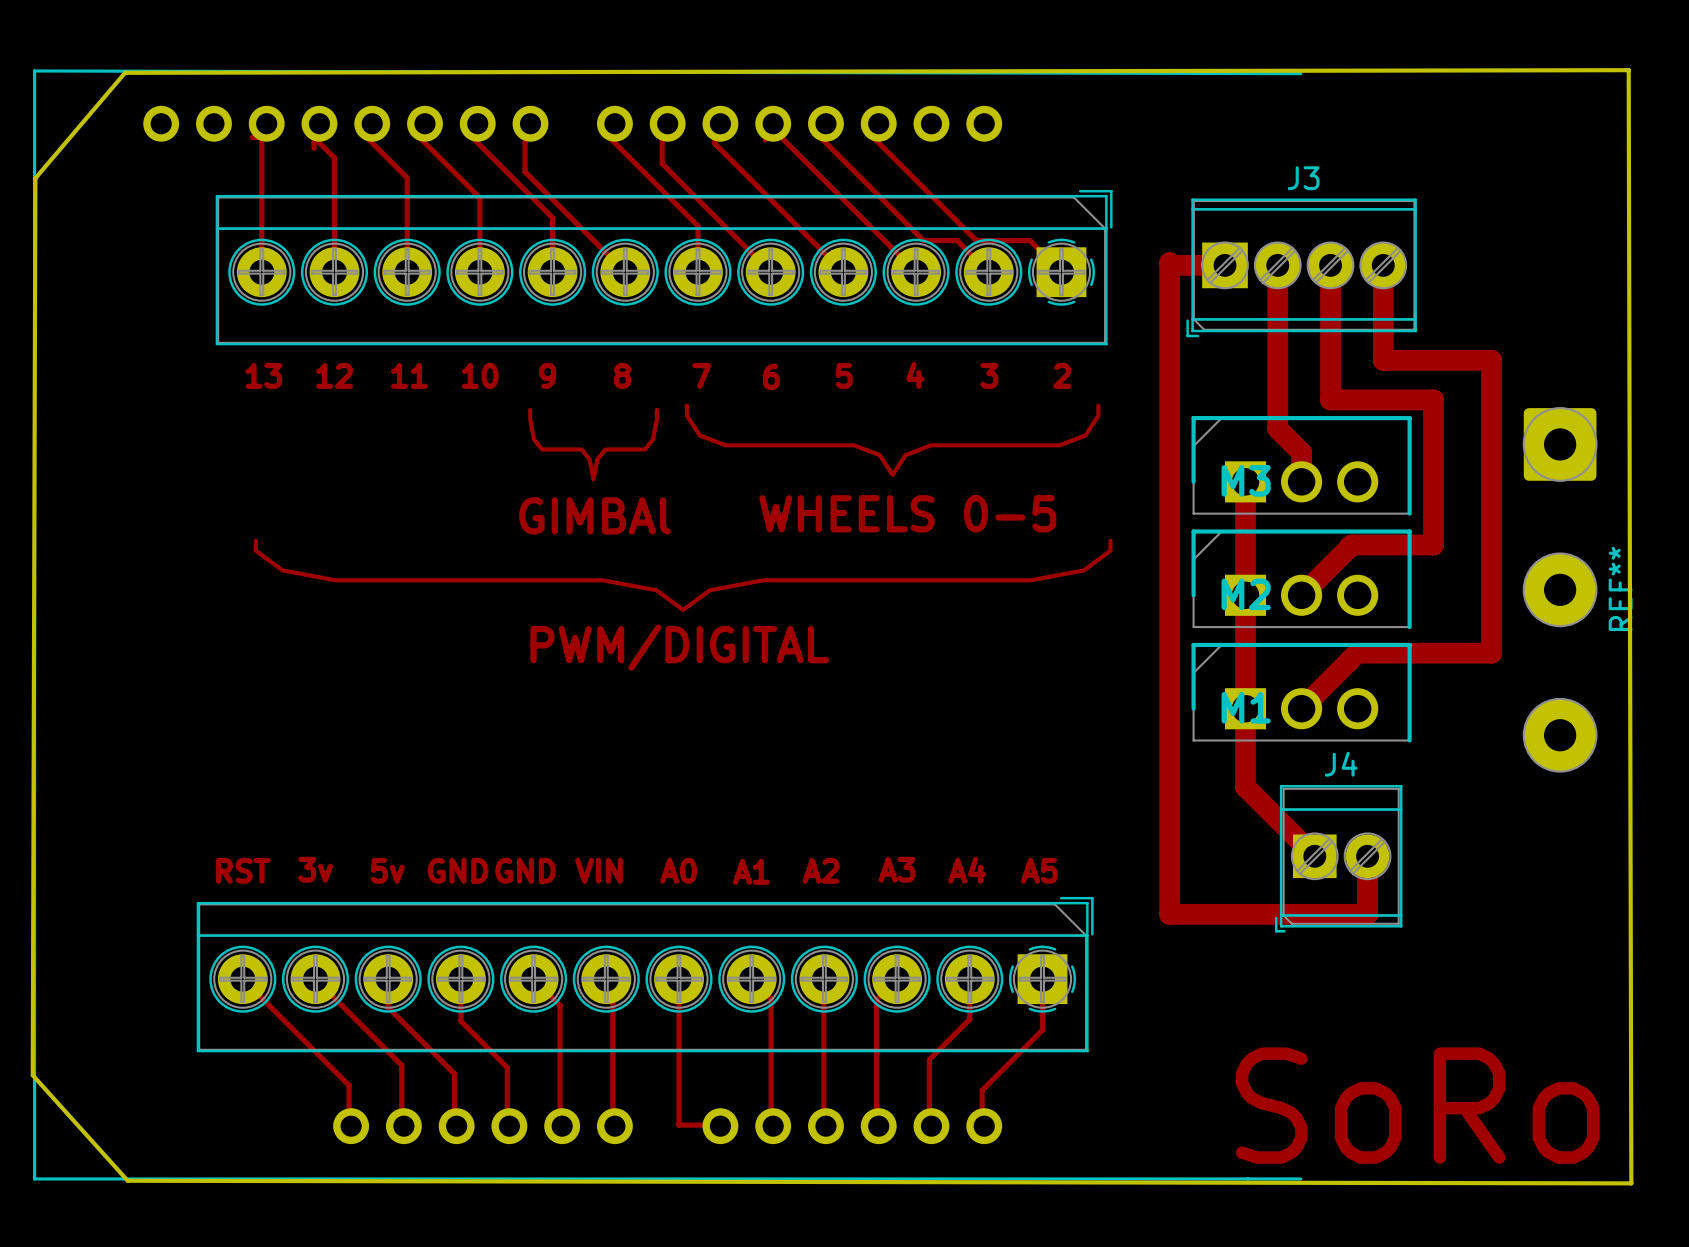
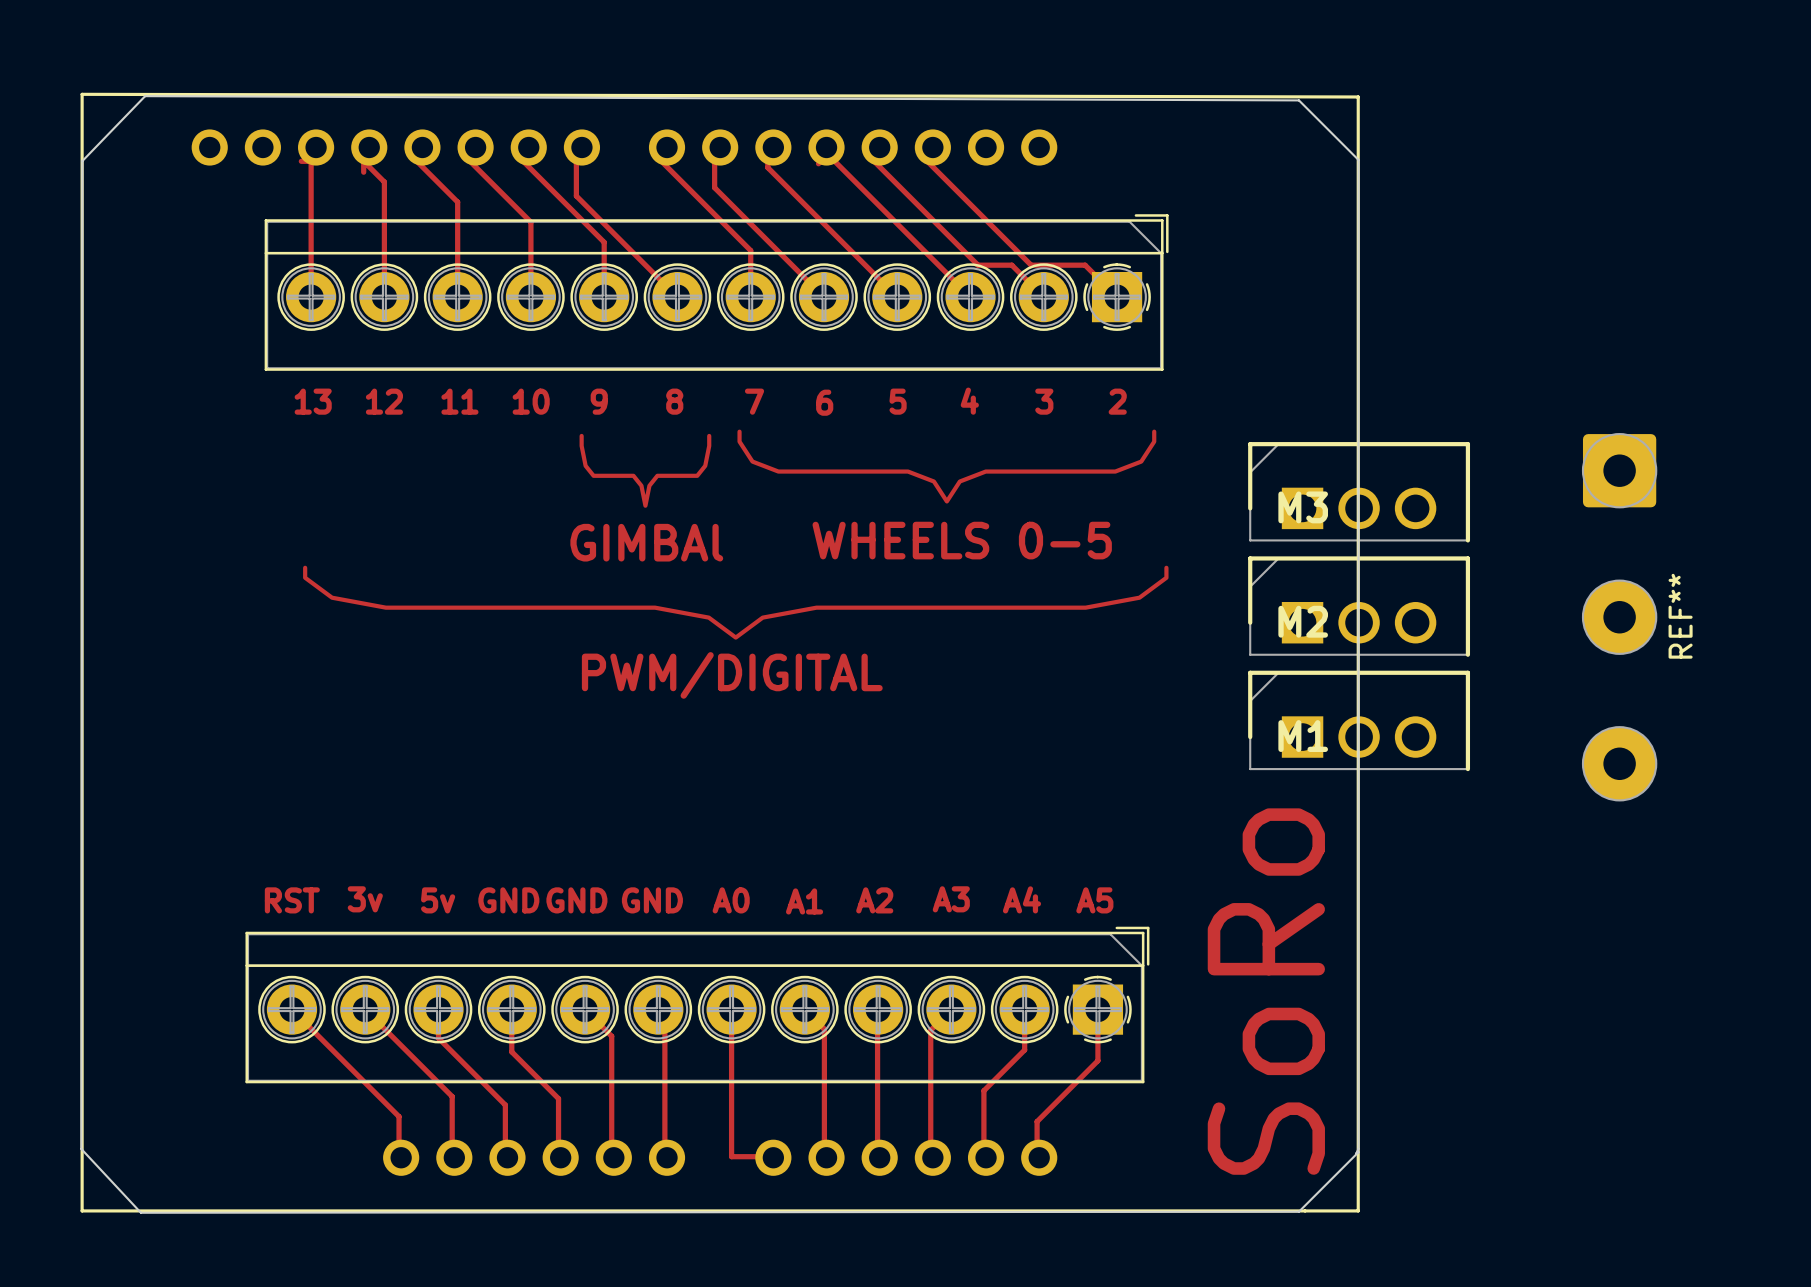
part footprint: [33, 69, 1303, 1181] -> [80, 92, 1360, 1213]
board edge: (1628, 70) (125, 72) (35, 178) (32, 1075) (127, 1180) (1631, 1183) (1628, 70) -> (145, 96) (82, 161) (81, 1148) (140, 1212) (1298, 1211) (1358, 1152) (1356, 1153) (1358, 1148) (1358, 159) (1298, 100) (145, 96)
track: (1225, 265) (1172, 265) (1169, 262) (1169, 914) (1367, 914) (1367, 856) -> none
track: (1277, 265) (1277, 428) (1301, 452) (1301, 481) -> none
track: (1330, 265) (1330, 399) -> none
track: (1383, 265) (1383, 360) (1491, 360) (1491, 653) (1357, 653) (1349, 661) -> none
J3: (1301, 267) -> none
track: (1330, 399) (1433, 399) (1433, 545) (1351, 545) (1349, 547) -> none
track: (1245, 481) (1245, 787) (1314, 856) -> none
track: (1349, 547) (1301, 595) -> none
track: (1349, 661) (1301, 708) -> none
J4: (1338, 858) -> none
text: VIN (598, 870) -> GND (652, 900)
text rotation: 0° (1417, 1105) -> 90° counterclockwise (1266, 991)

